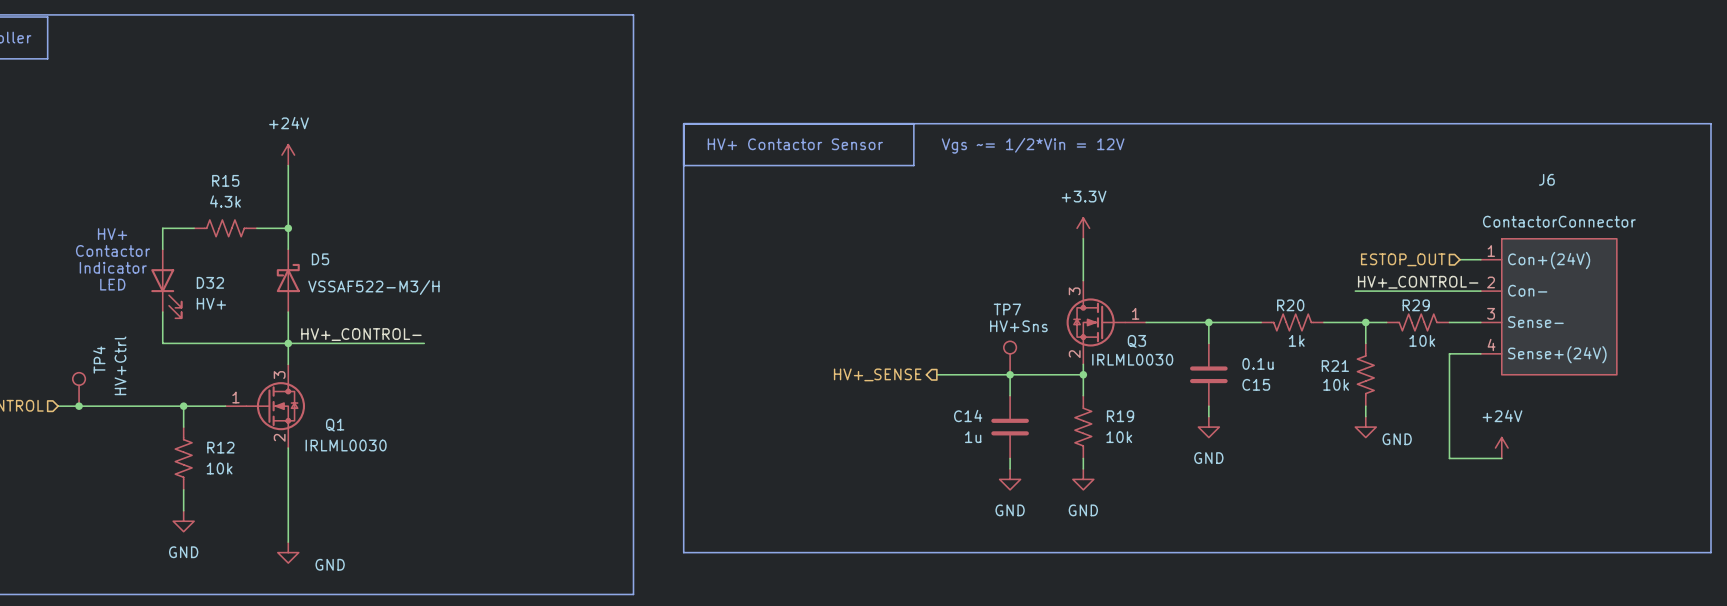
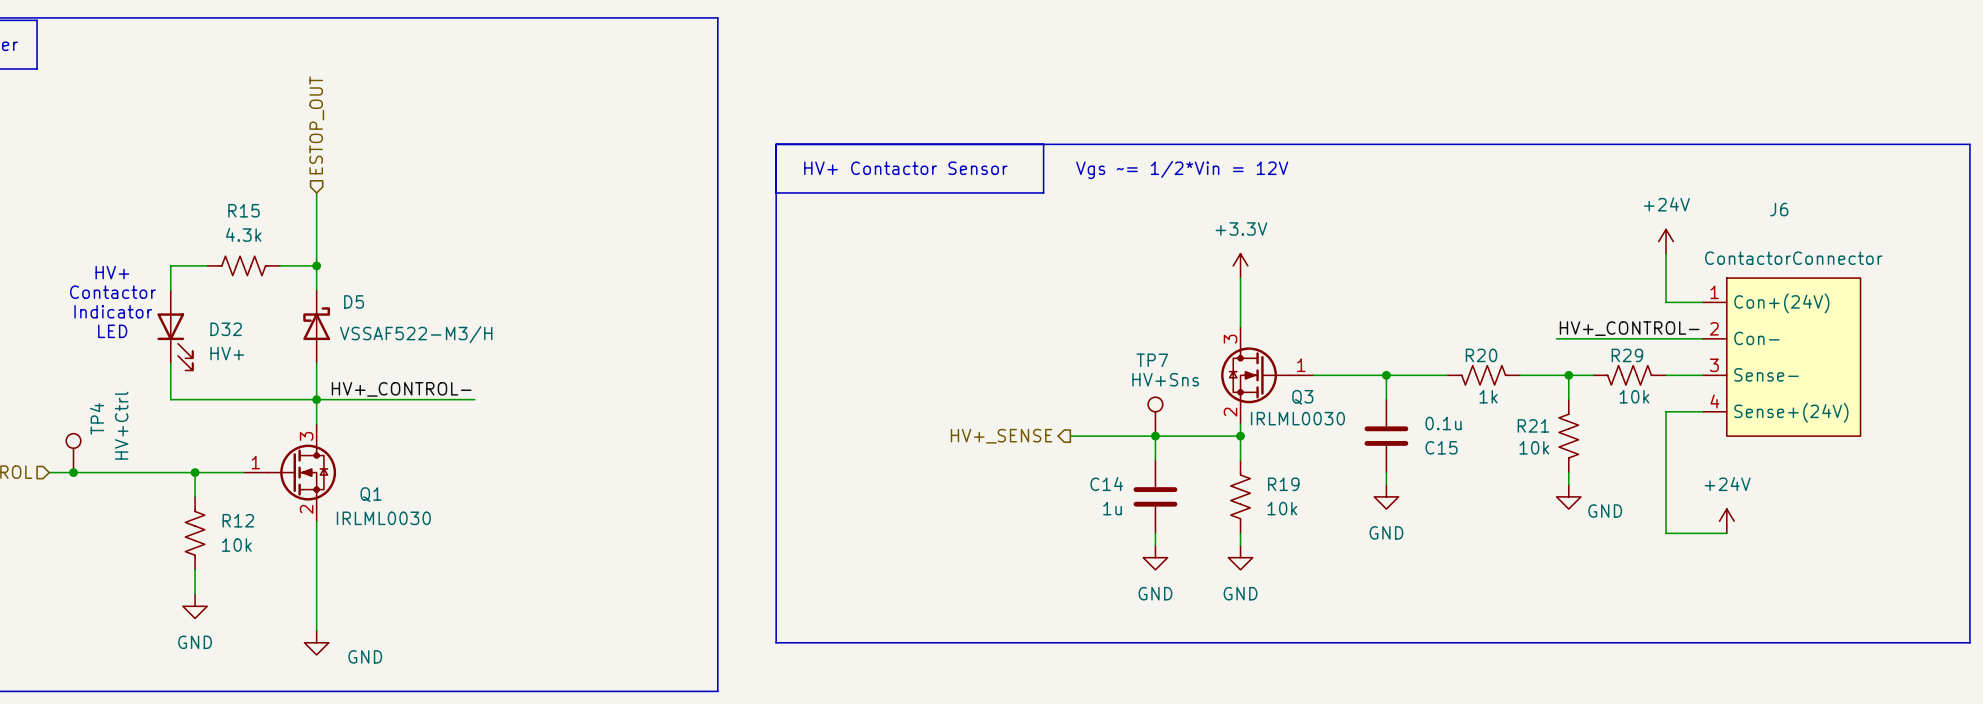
hierarchical label: none -> ESTOP_OUT (316, 125)
power symbol: +24V (288, 155) -> none
power symbol: none -> +24V (1666, 241)
wire: none -> (1666, 253) (1666, 302) (1678, 302)
hierarchical label: ESTOP_OUT (1403, 259) -> none

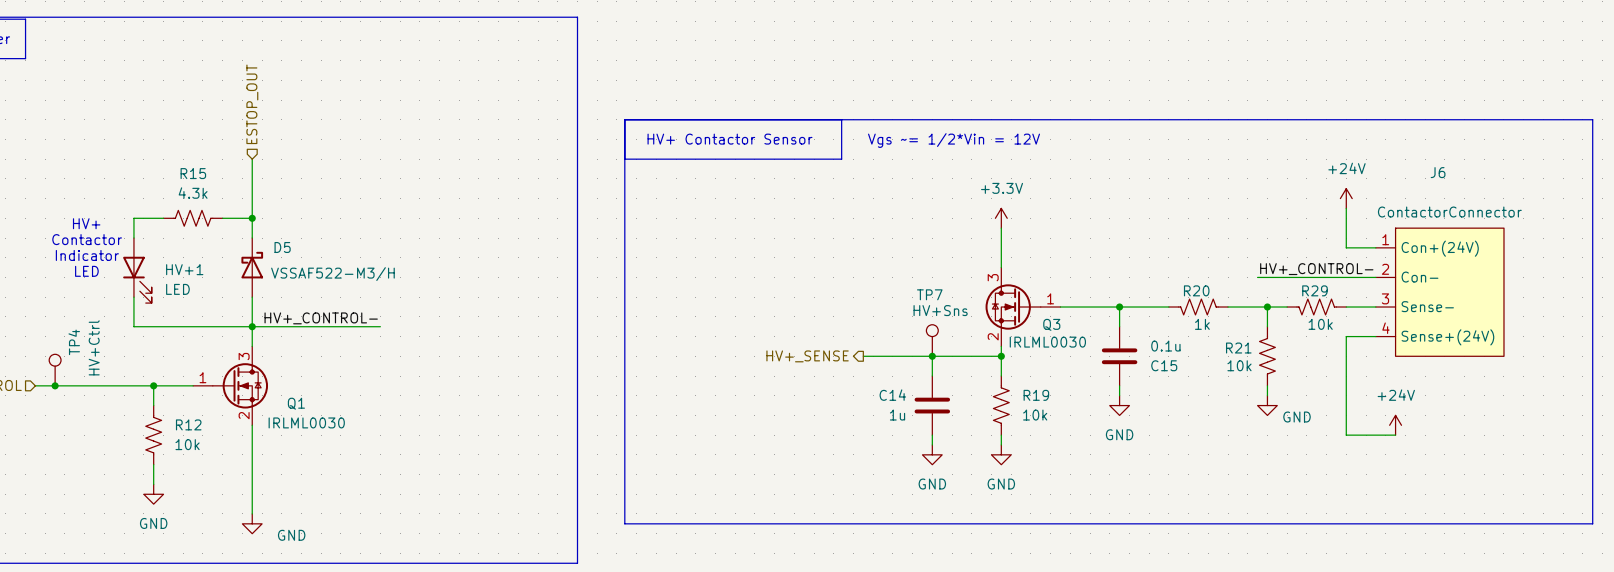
D32 name: D32 (226, 329) -> HV+1 (184, 269)
D32 value: HV+ (227, 353) -> LED (177, 289)

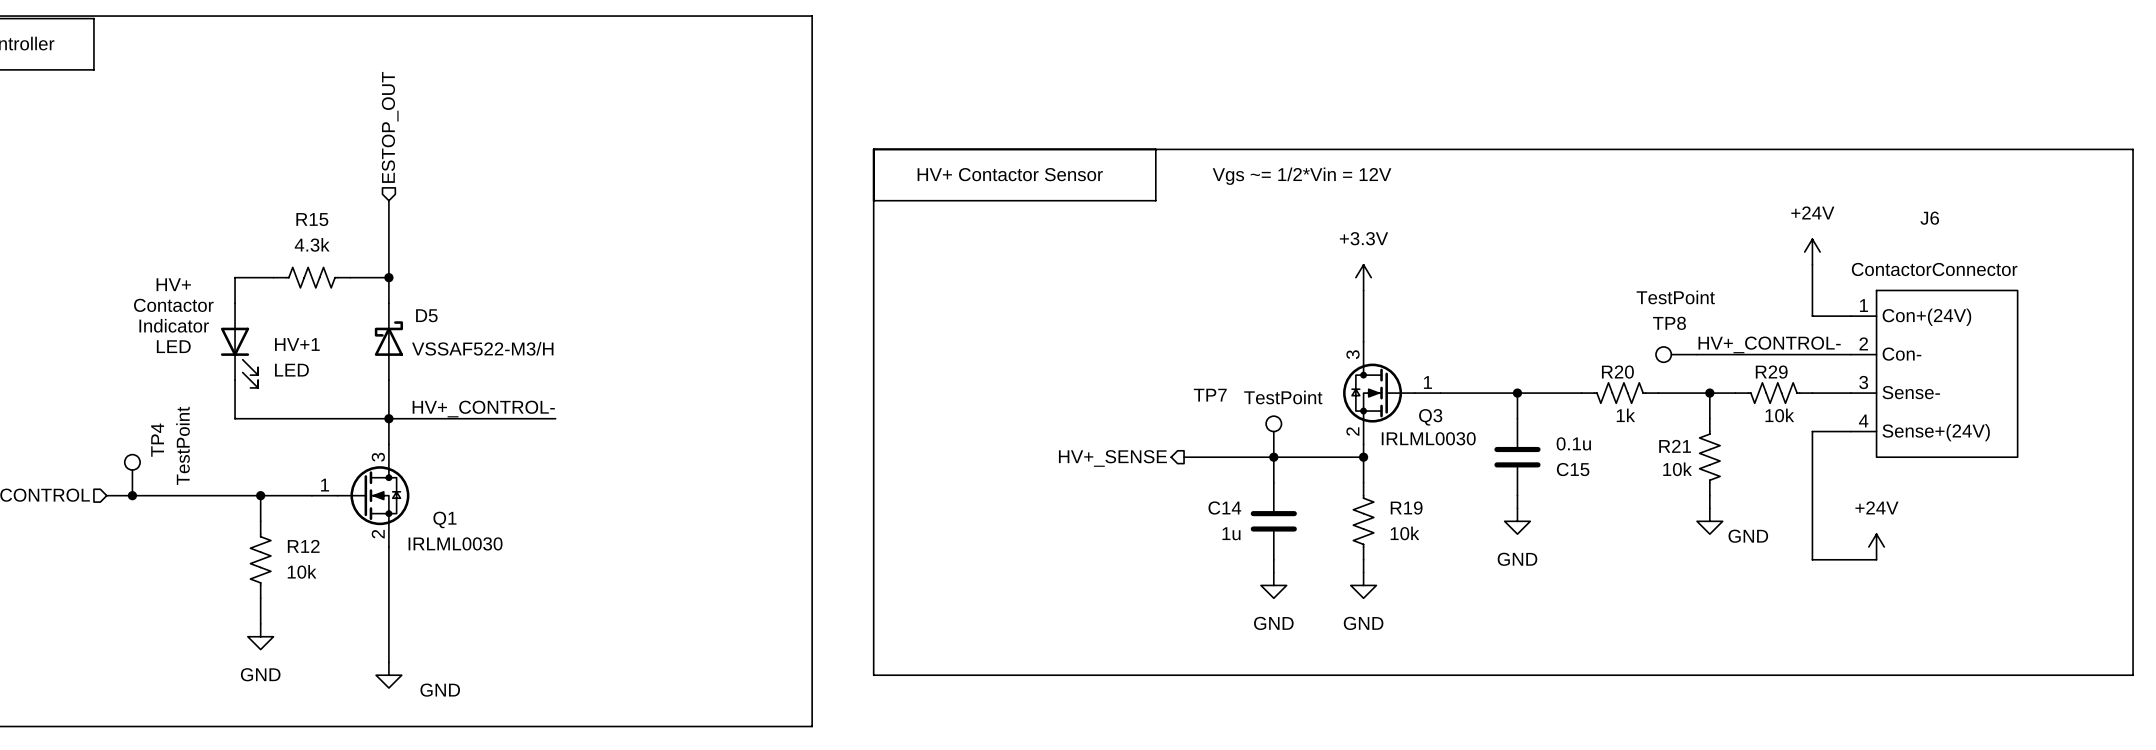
TP8: none -> TestPoint (1676, 354)
TP7 name position: TP7 (929, 294) -> TP7 (1210, 395)
TP7 value: HV+Sns (940, 310) -> TestPoint (1283, 397)
TP4 value: HV+Ctrl (94, 347) -> TestPoint (182, 445)

